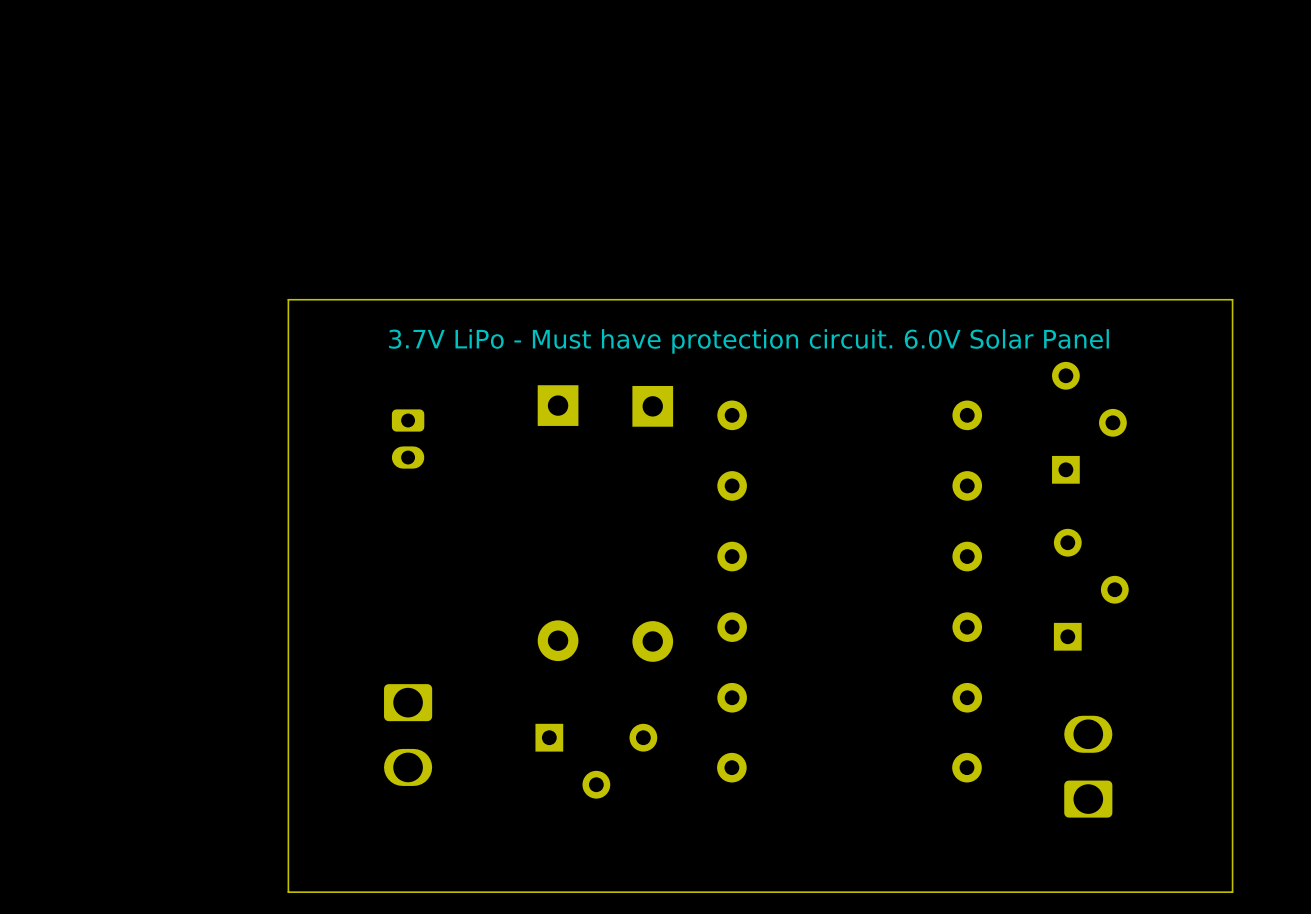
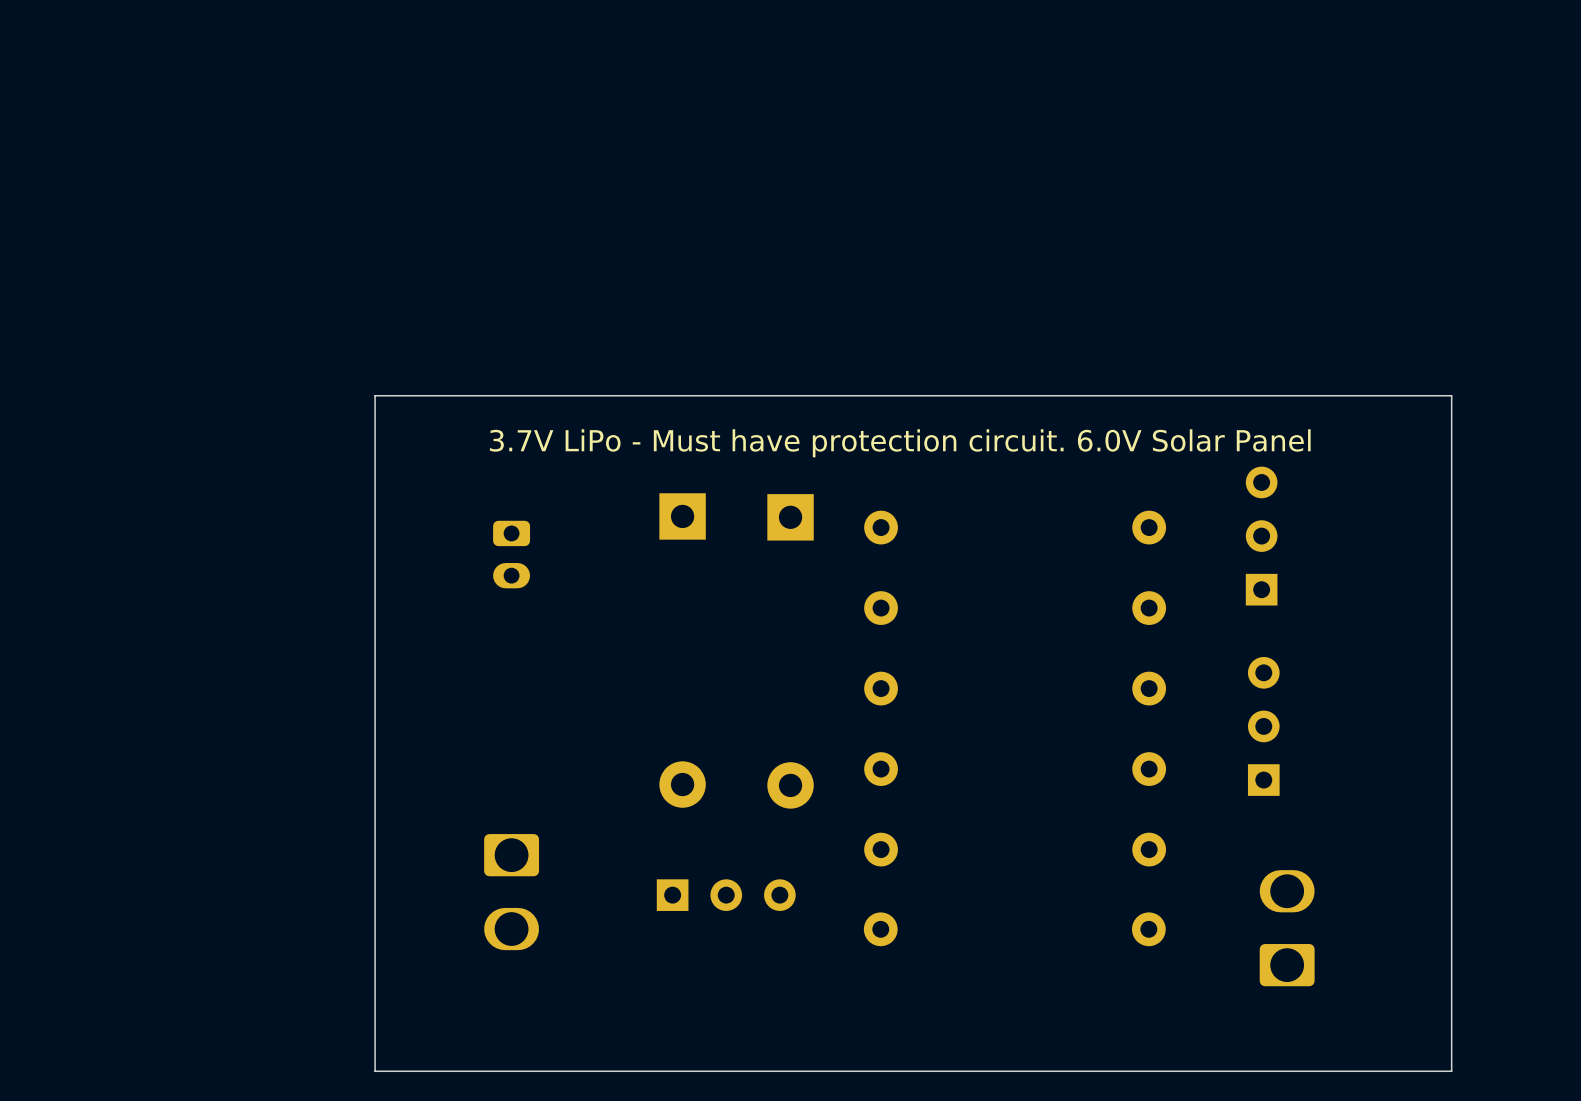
part: none -> (1261, 536)
part: (1089, 422) -> none
part: none -> (1263, 726)
part: (1091, 589) -> none
part: none -> (726, 895)
part: (596, 761) -> none

